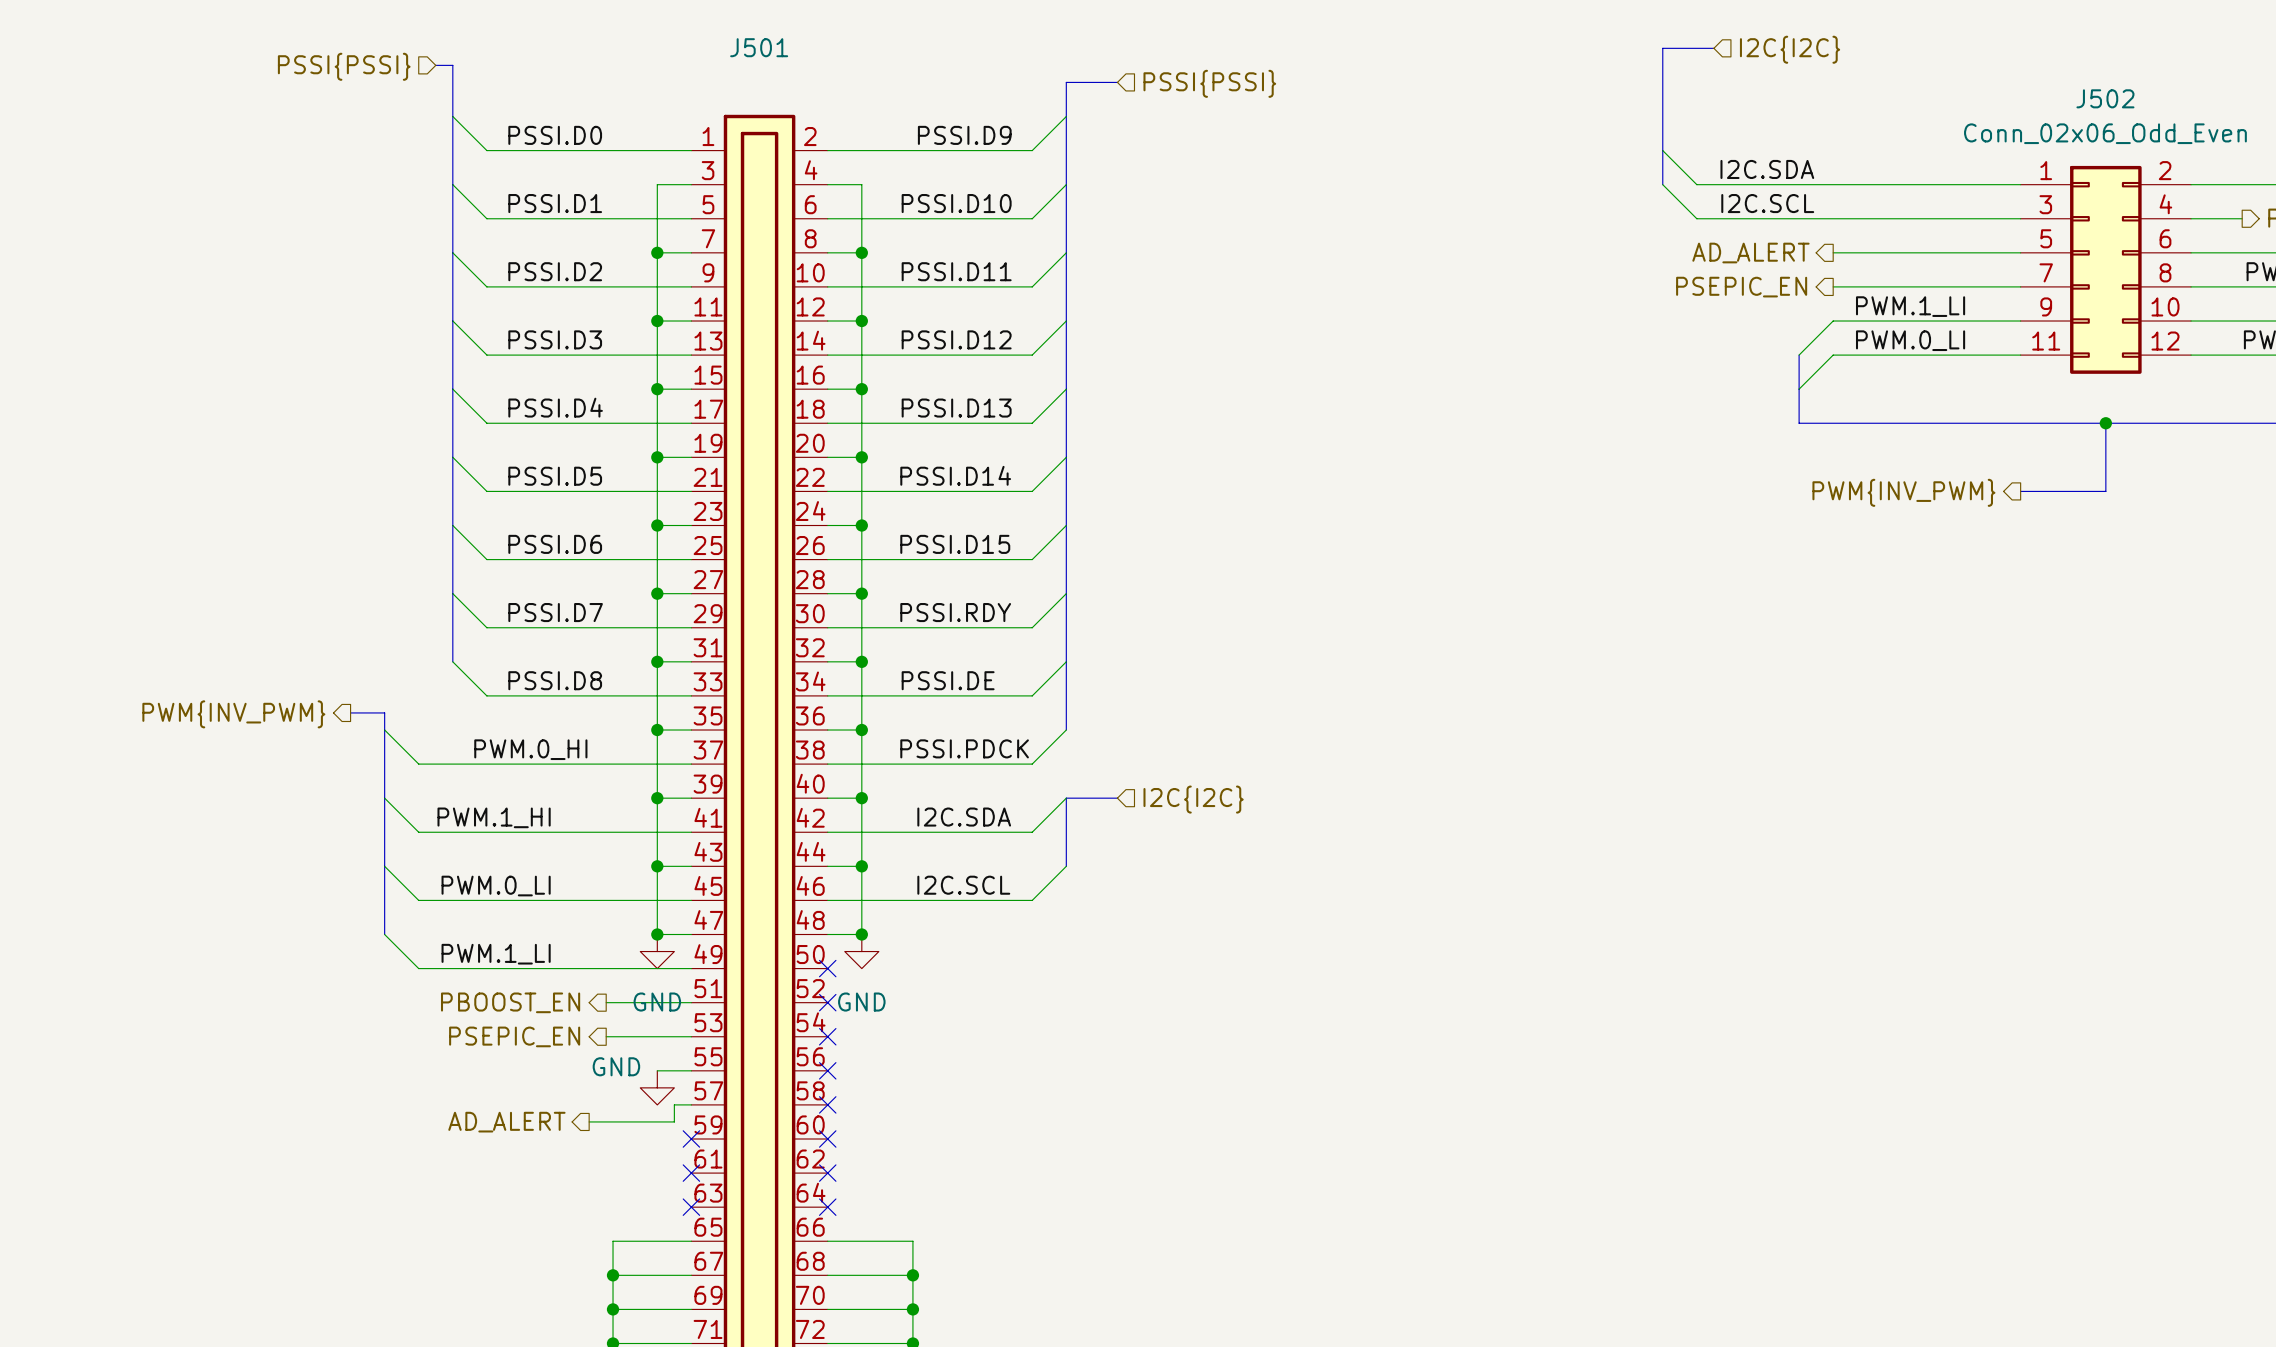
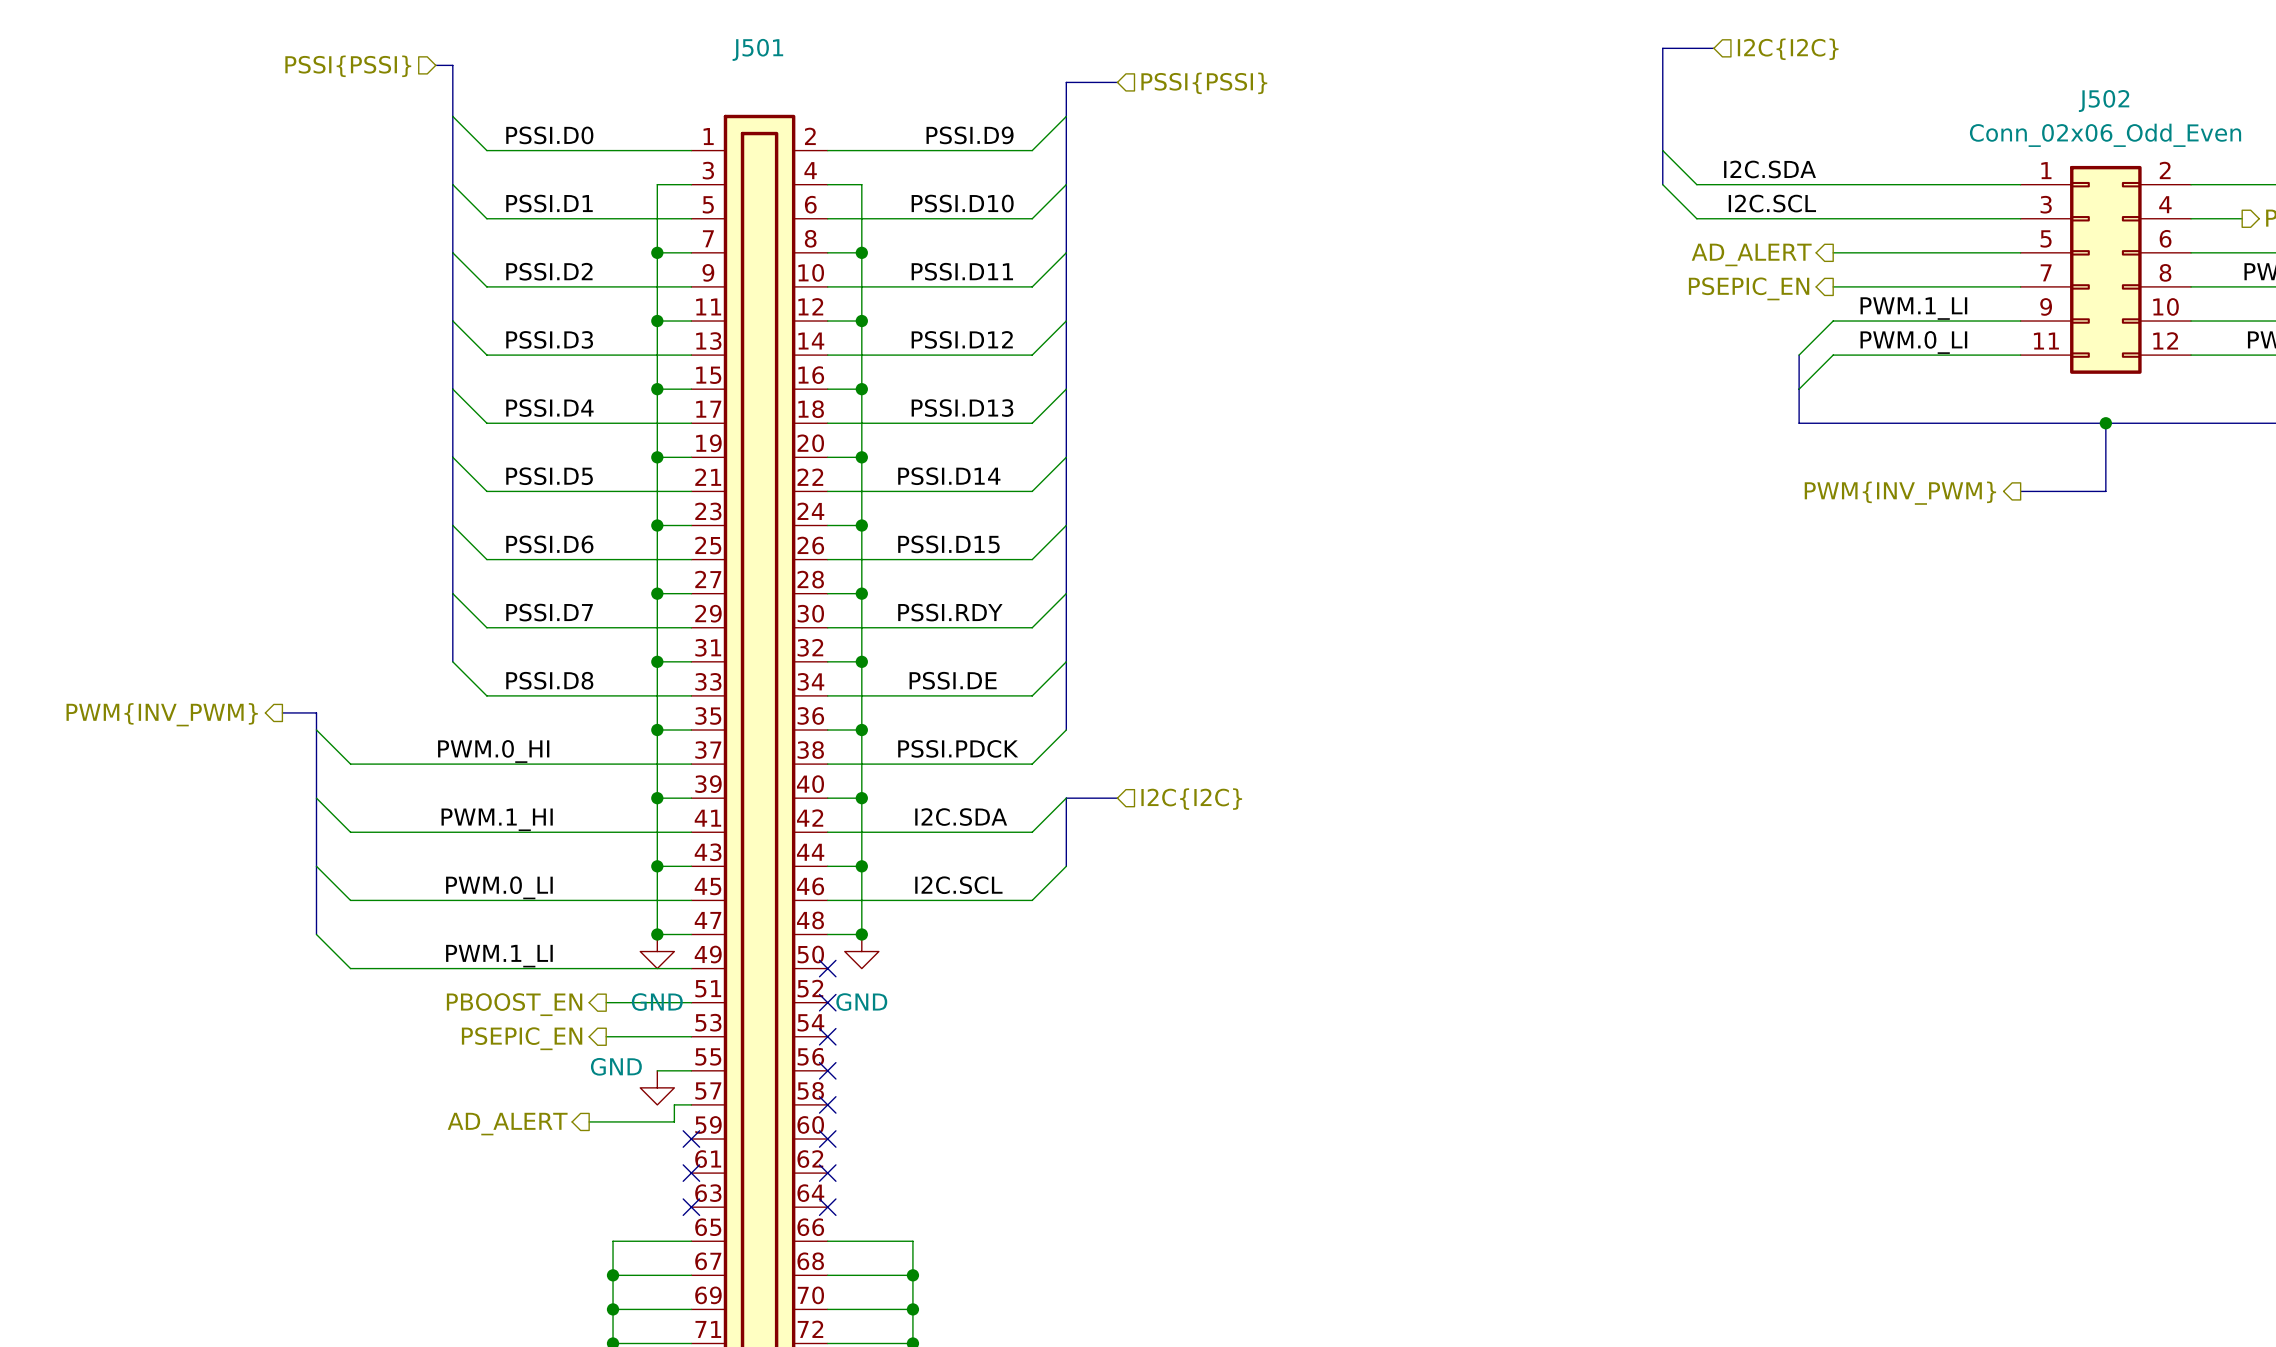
bus: (350, 712) (384, 712) (384, 934) -> (282, 712) (316, 712) (316, 934)
hierarchical label position: PWM{INV_PWM} (233, 714) -> PWM{INV_PWM} (162, 714)
wire: (384, 730) (418, 764) -> (316, 730) (350, 764) (418, 764)
label position: PWM.0_HI (530, 749) -> PWM.0_HI (493, 751)
wire: (384, 798) (418, 832) -> (316, 798) (350, 832) (418, 832)
wire: (384, 866) (418, 900) -> (316, 866) (350, 900) (418, 900)
wire: (384, 934) (418, 968) -> (316, 934) (350, 968) (418, 968)

